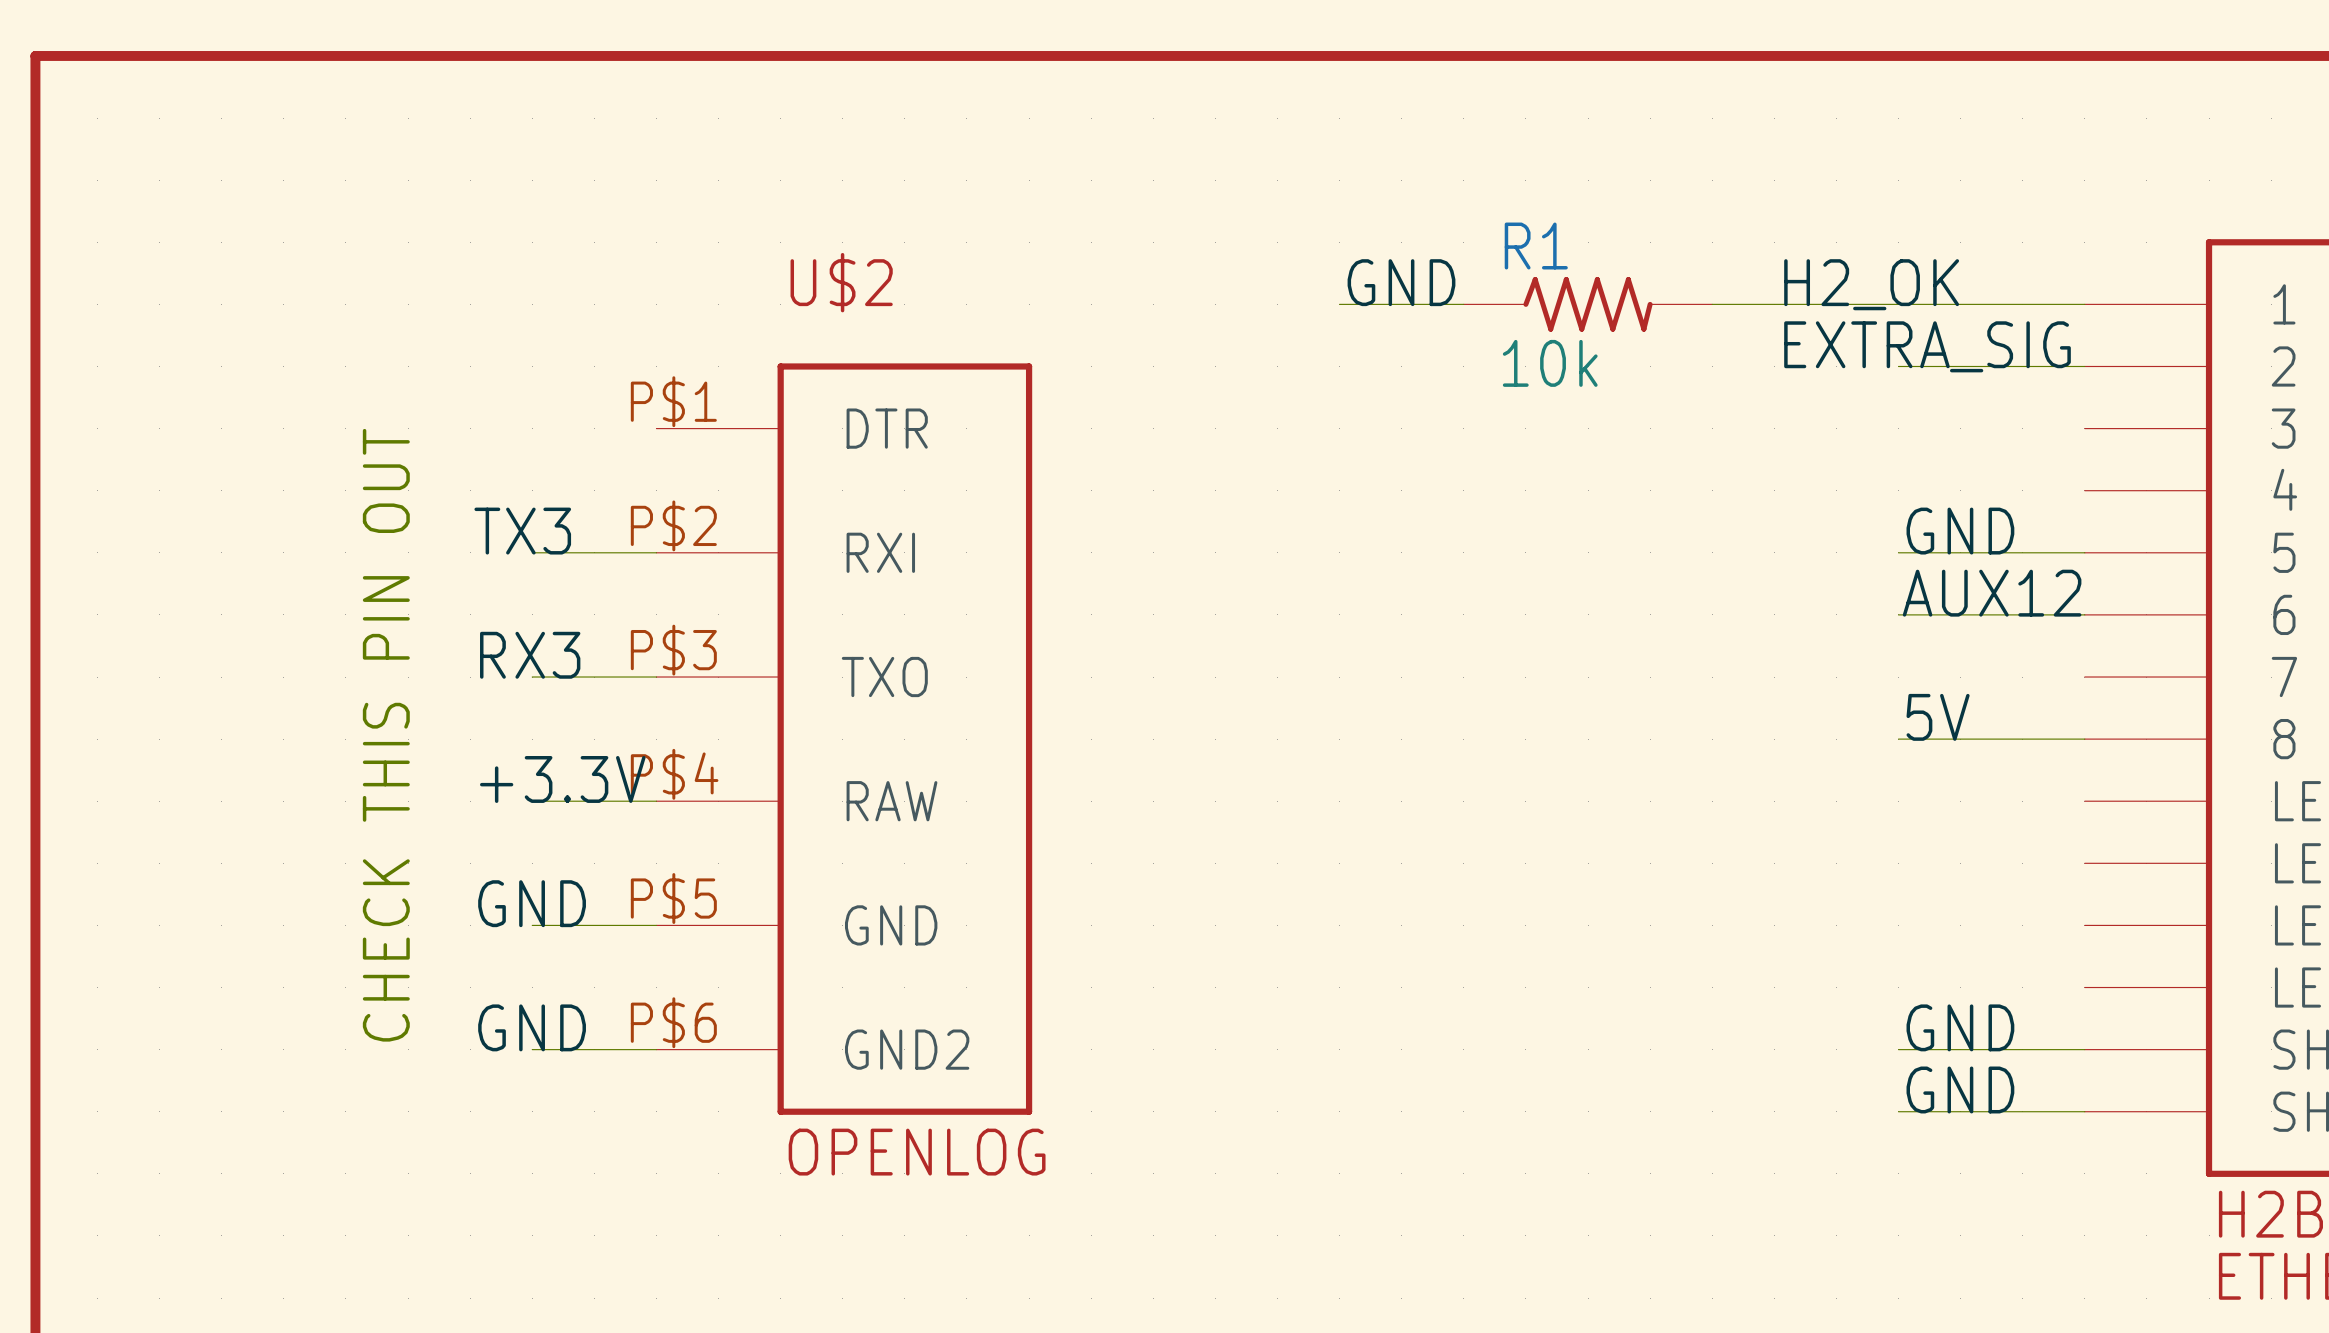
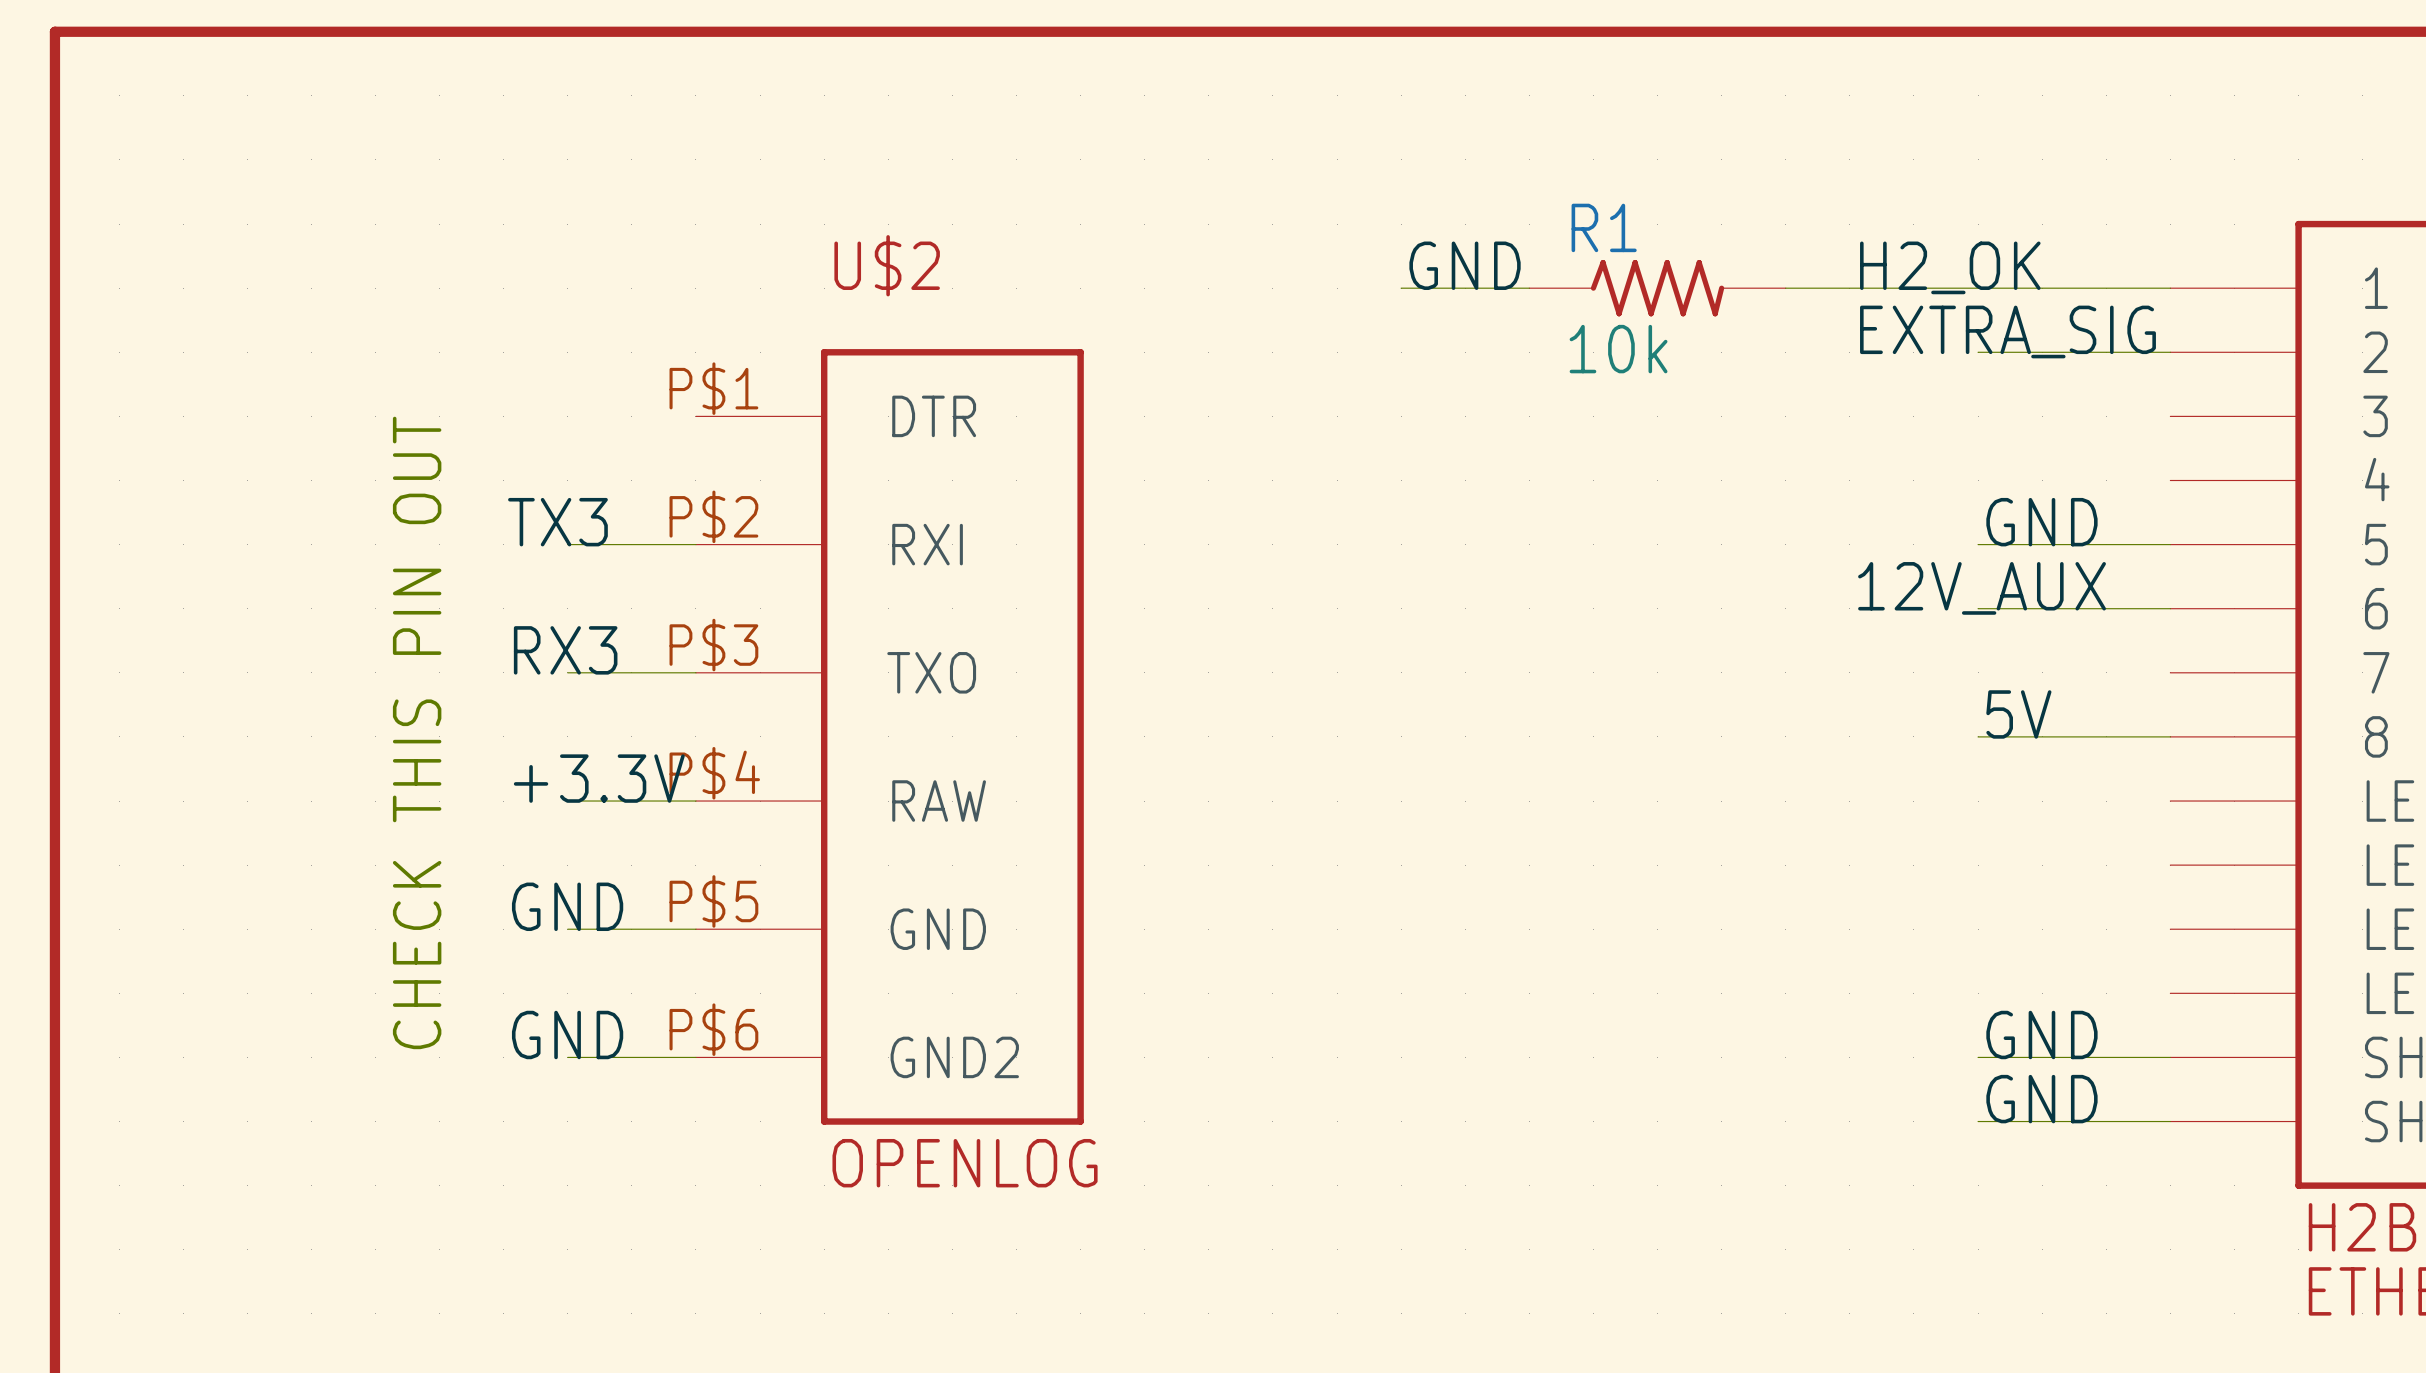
label: AUX12 (1992, 593) -> none
label: none -> 12V_AUX (1982, 588)

